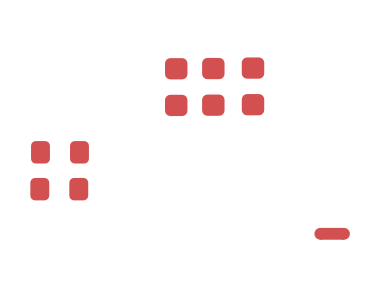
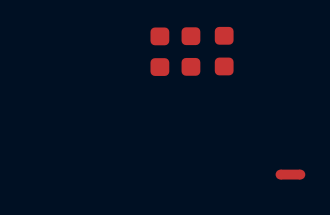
part: (59, 152) -> none
part: (59, 189) -> none

